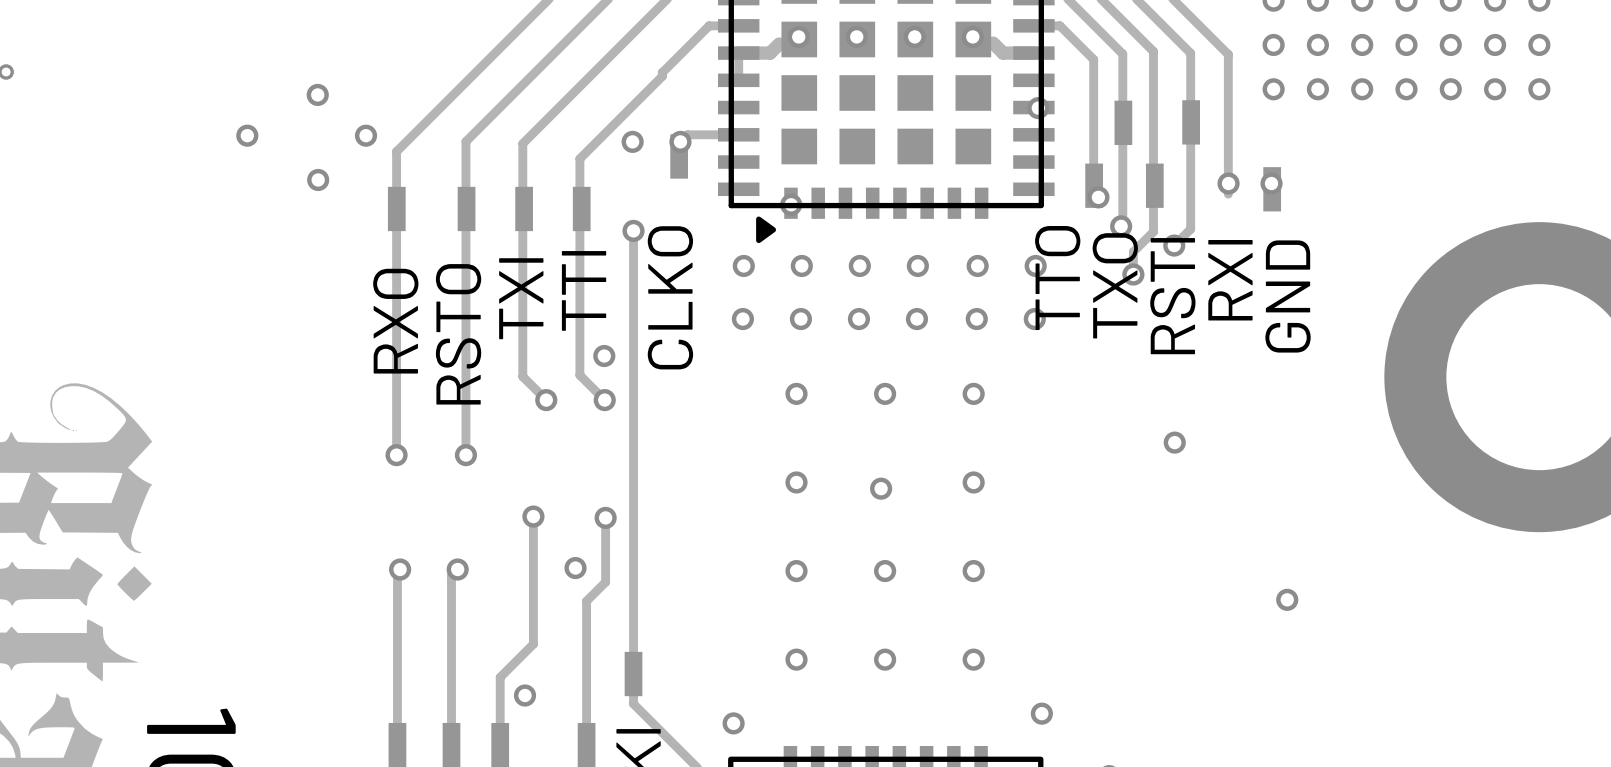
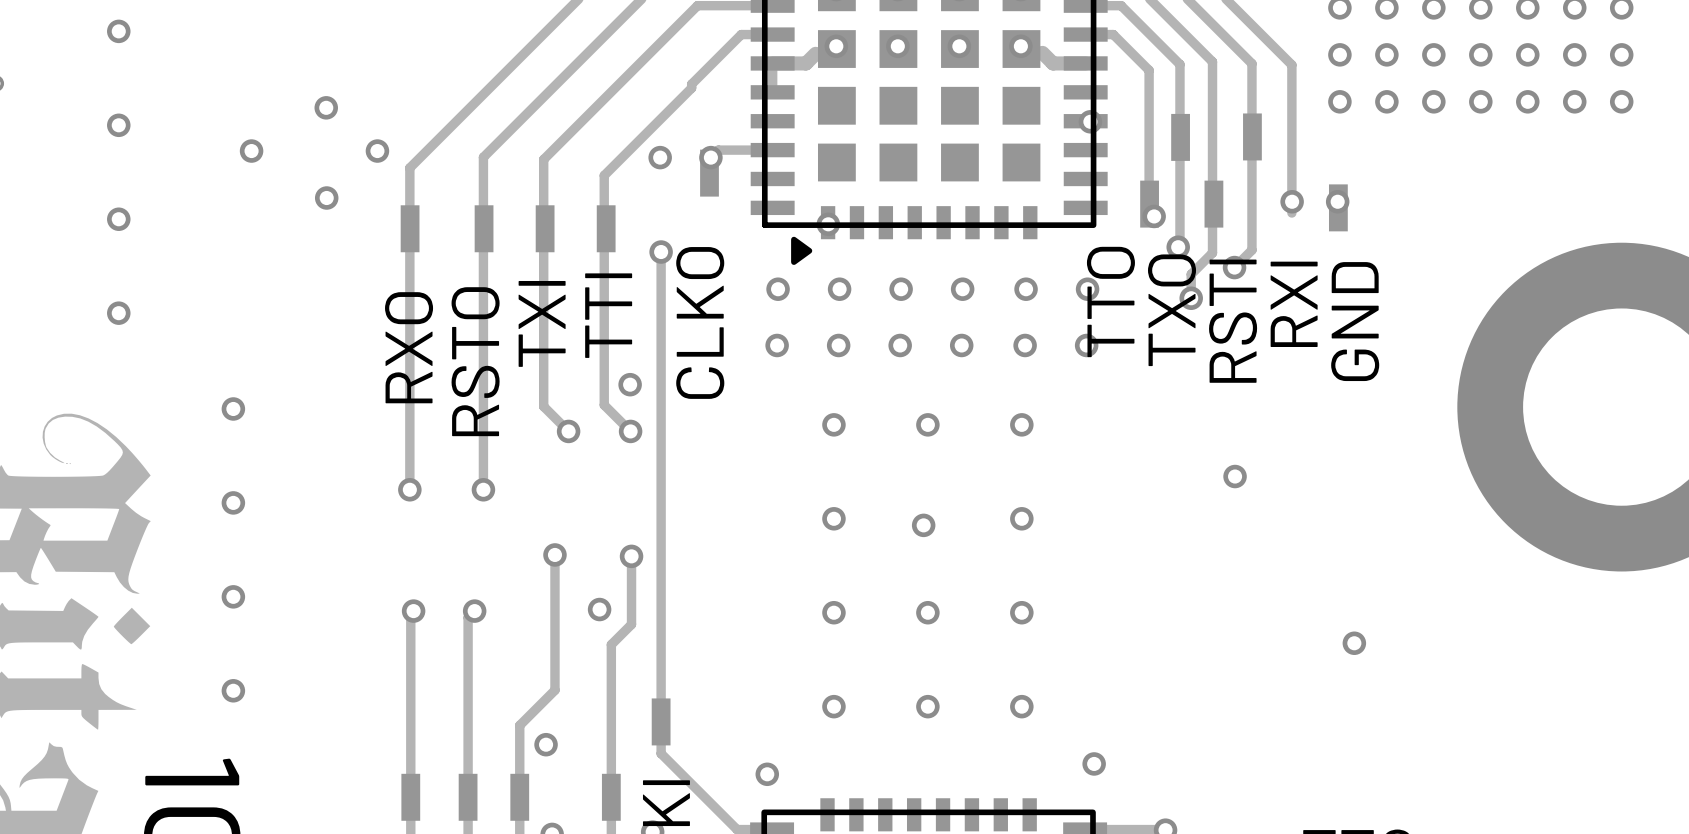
via: none -> (118, 31)
via: none -> (118, 125)
via: none -> (118, 219)
via: none -> (118, 313)
via: none -> (233, 408)
via: none -> (233, 502)
via: none -> (233, 596)
via: none -> (233, 690)

